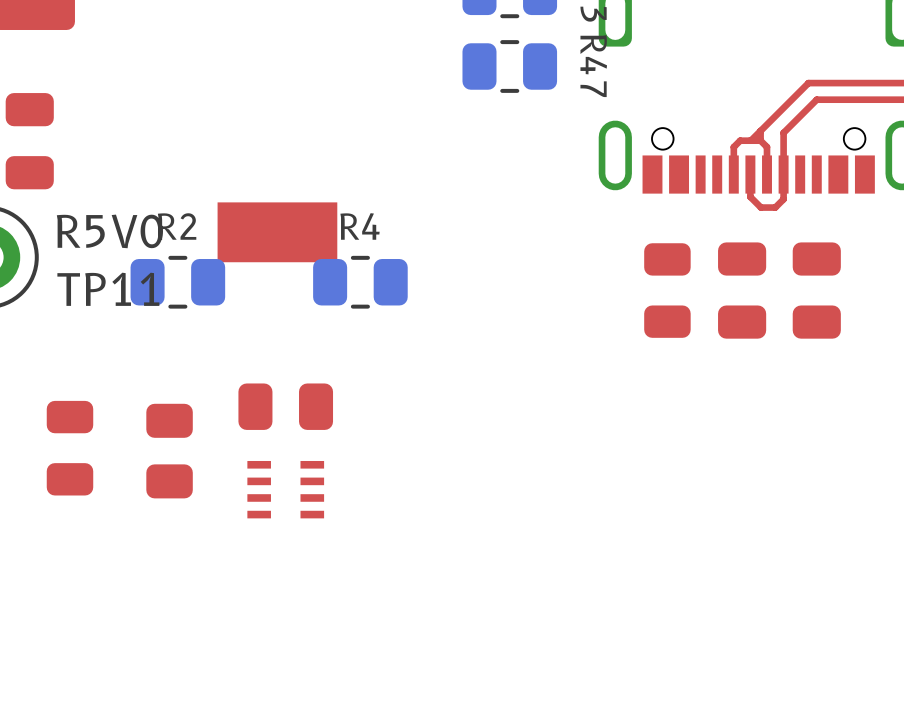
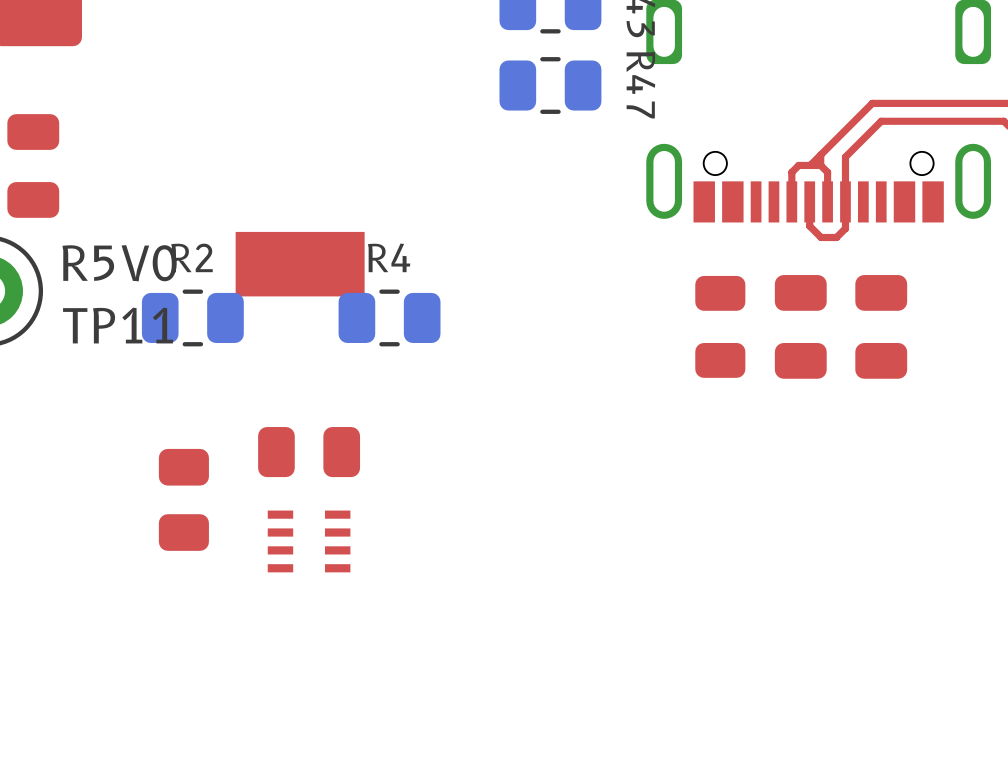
part: (69, 448) -> none

